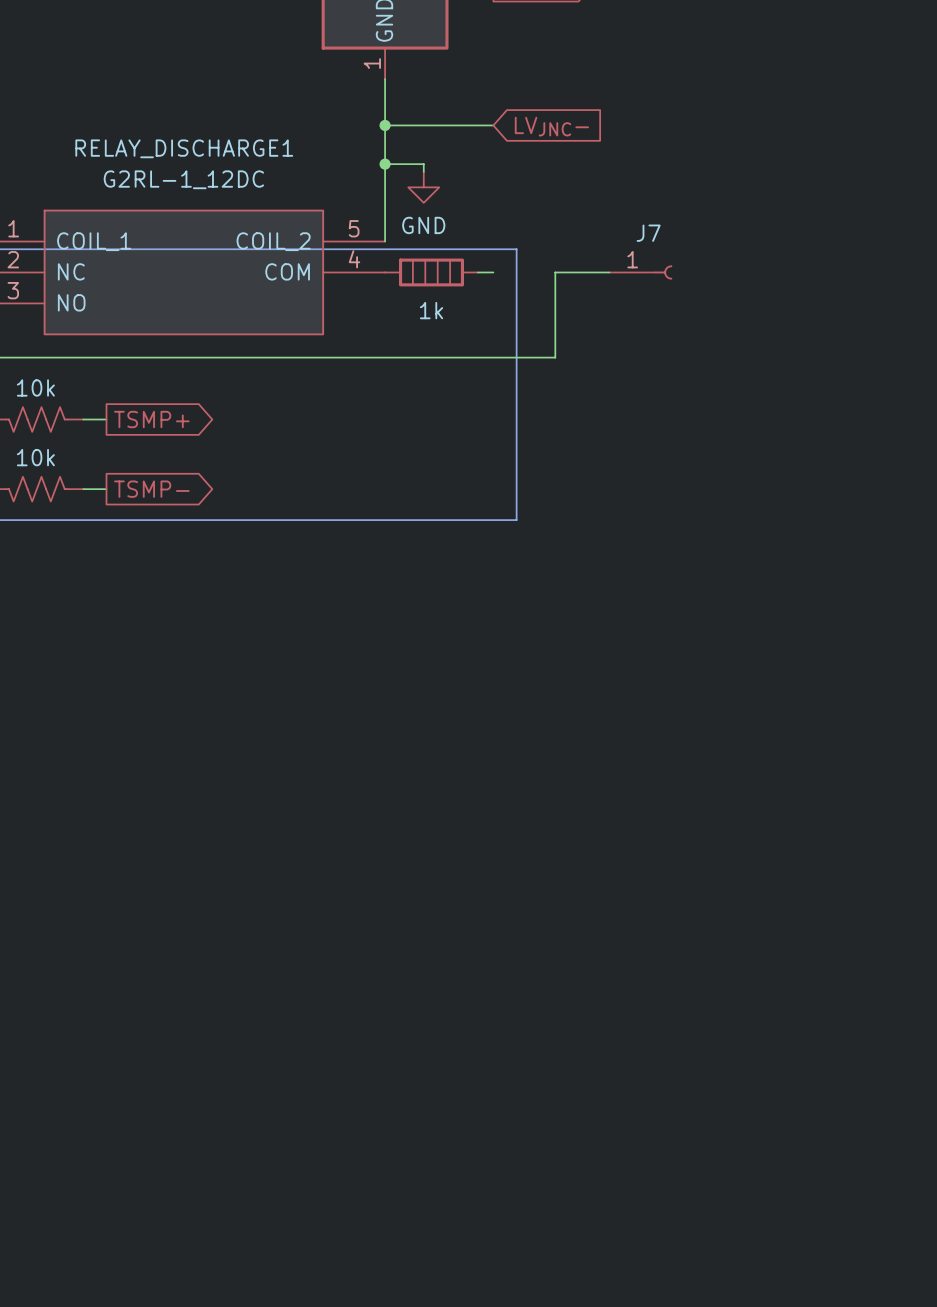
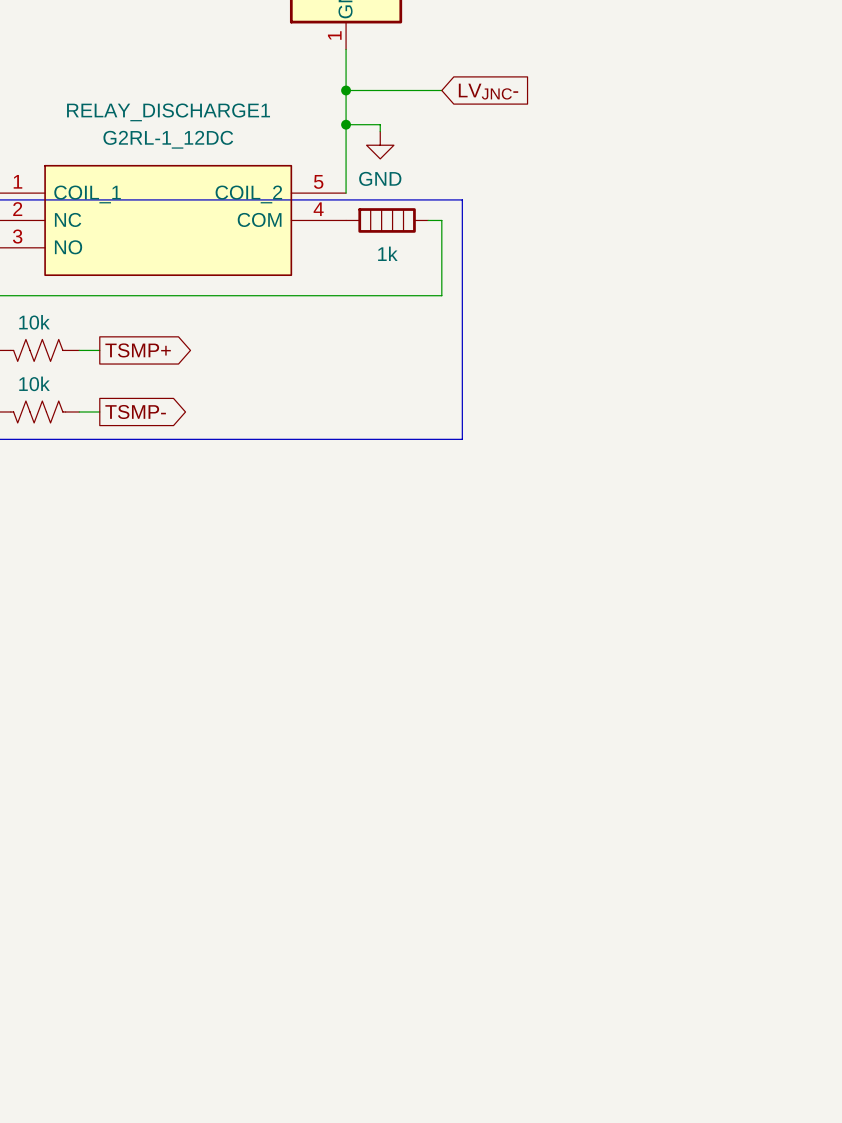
wire: (609, 272) (555, 272) (555, 357) (493, 357) -> (441, 220) (441, 295)
J7: (640, 272) -> none

